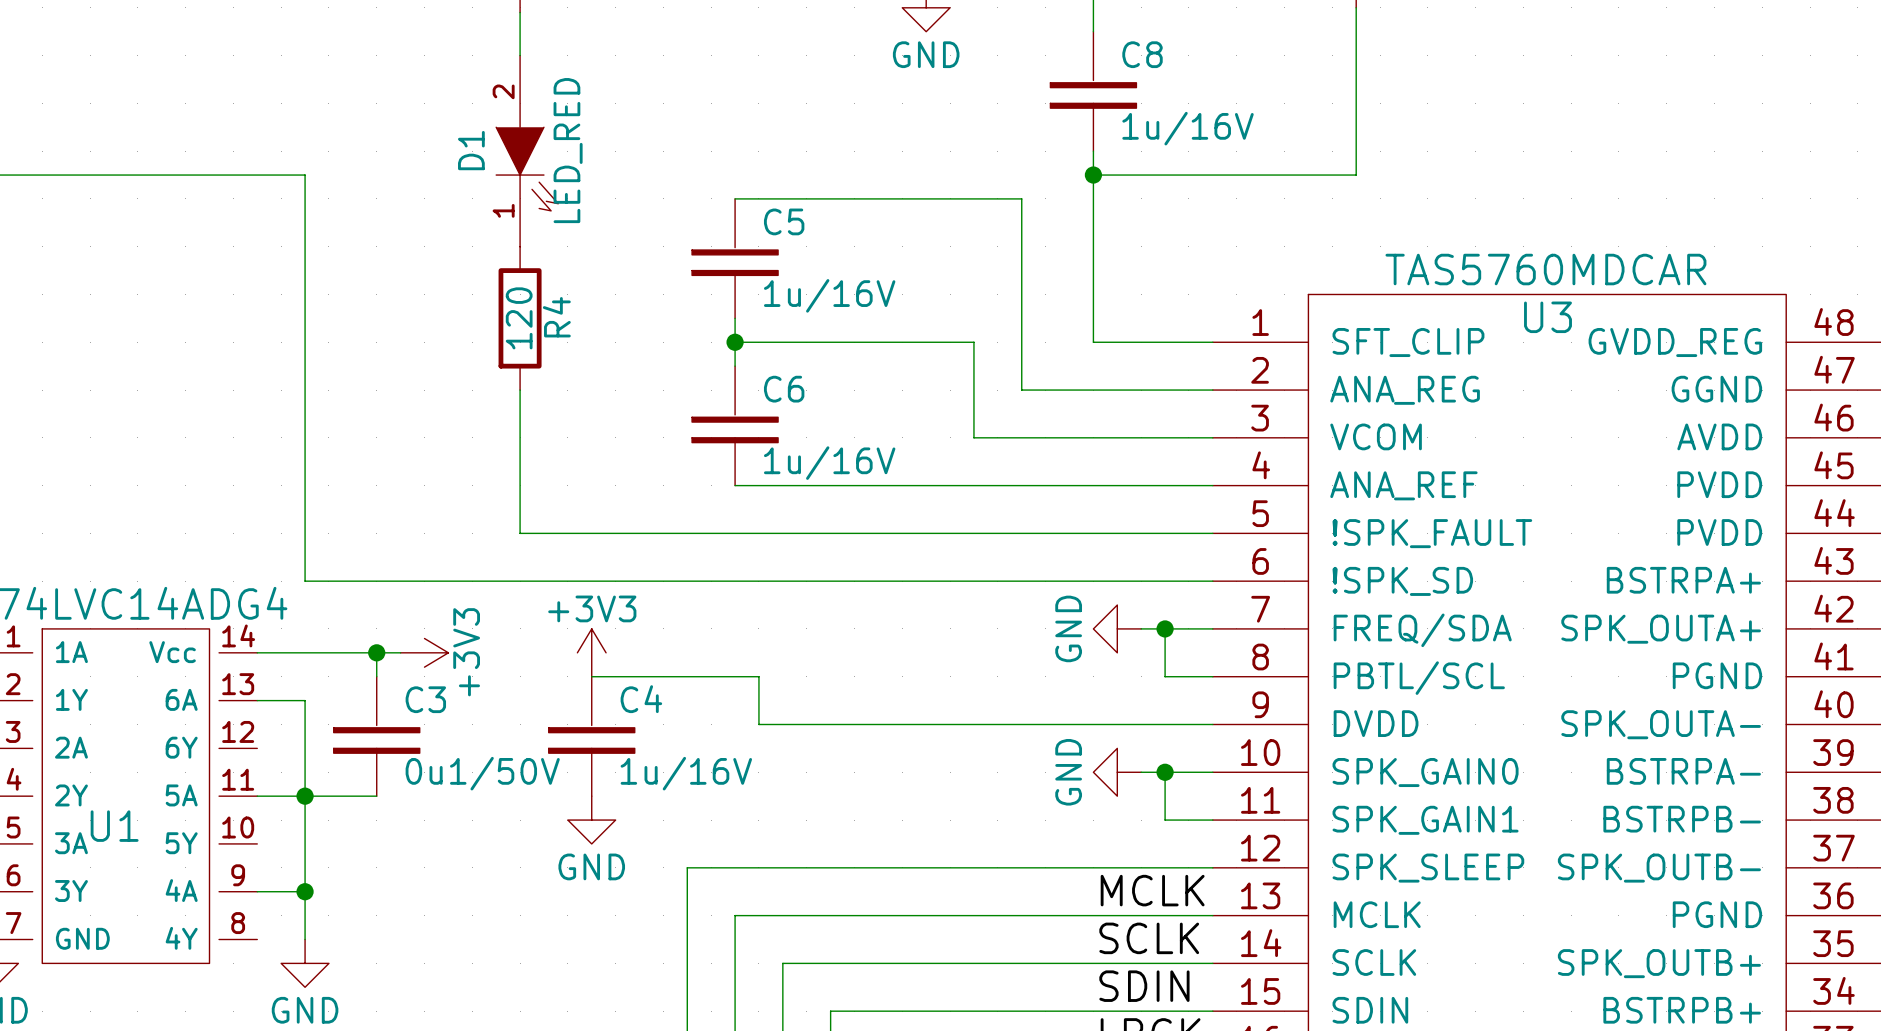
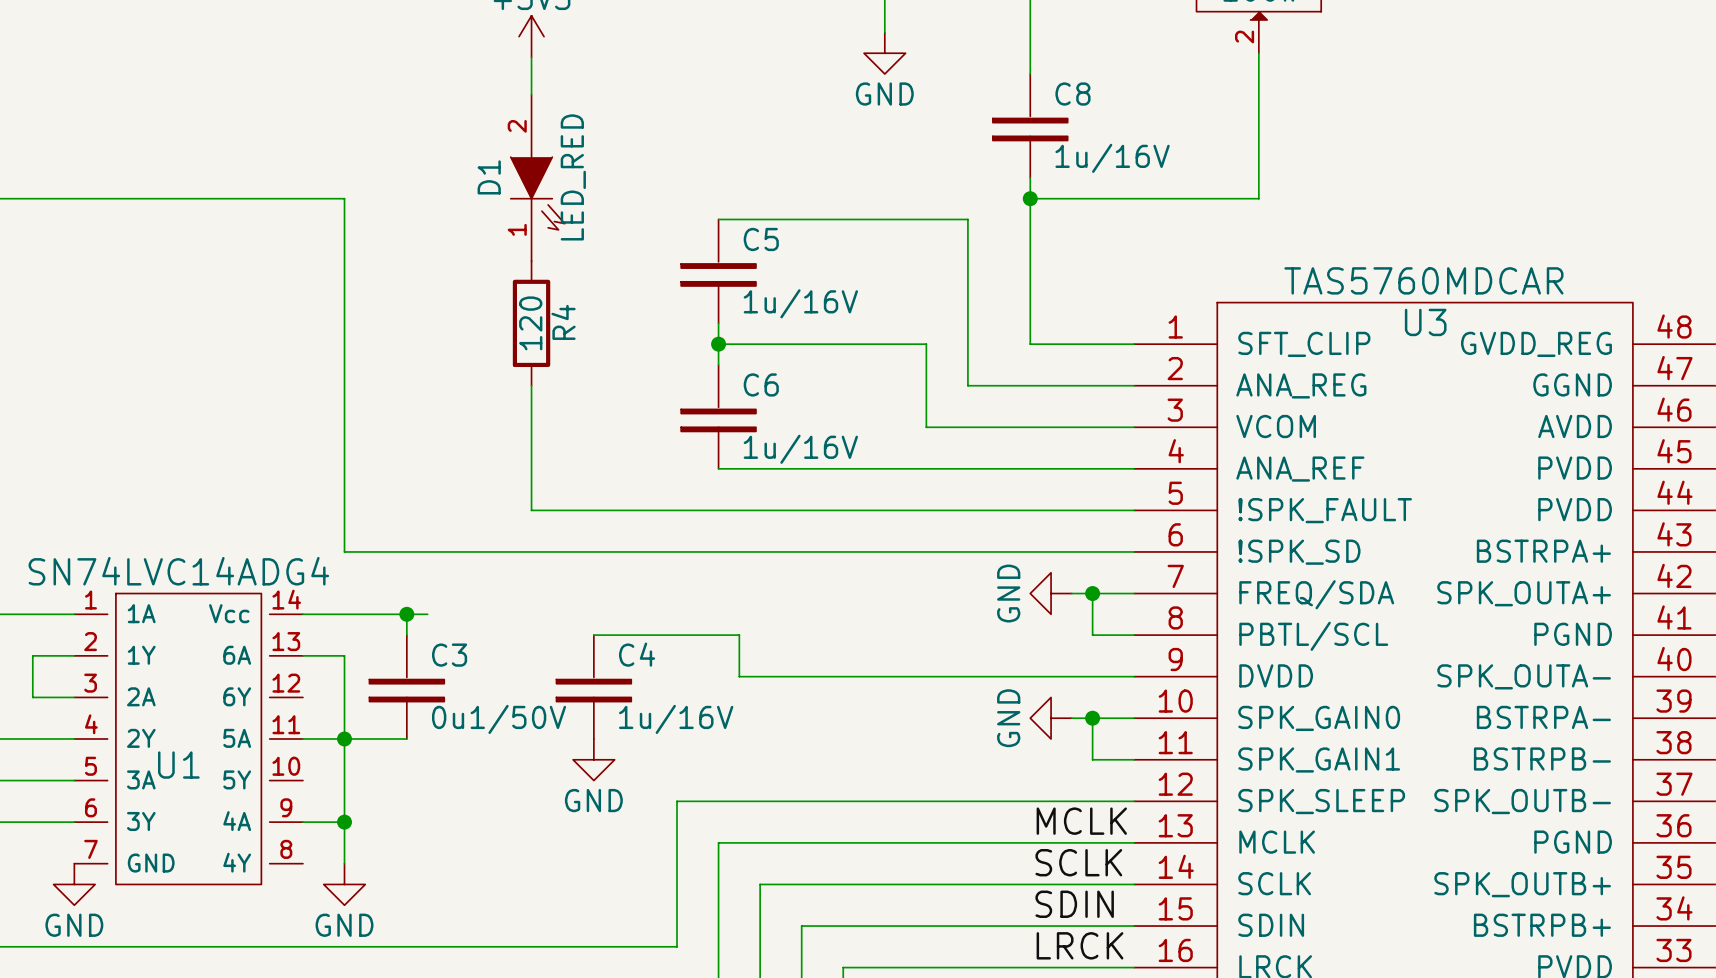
power symbol: +3V3 (424, 652) -> none
power symbol: +3V3 (591, 652) -> none

